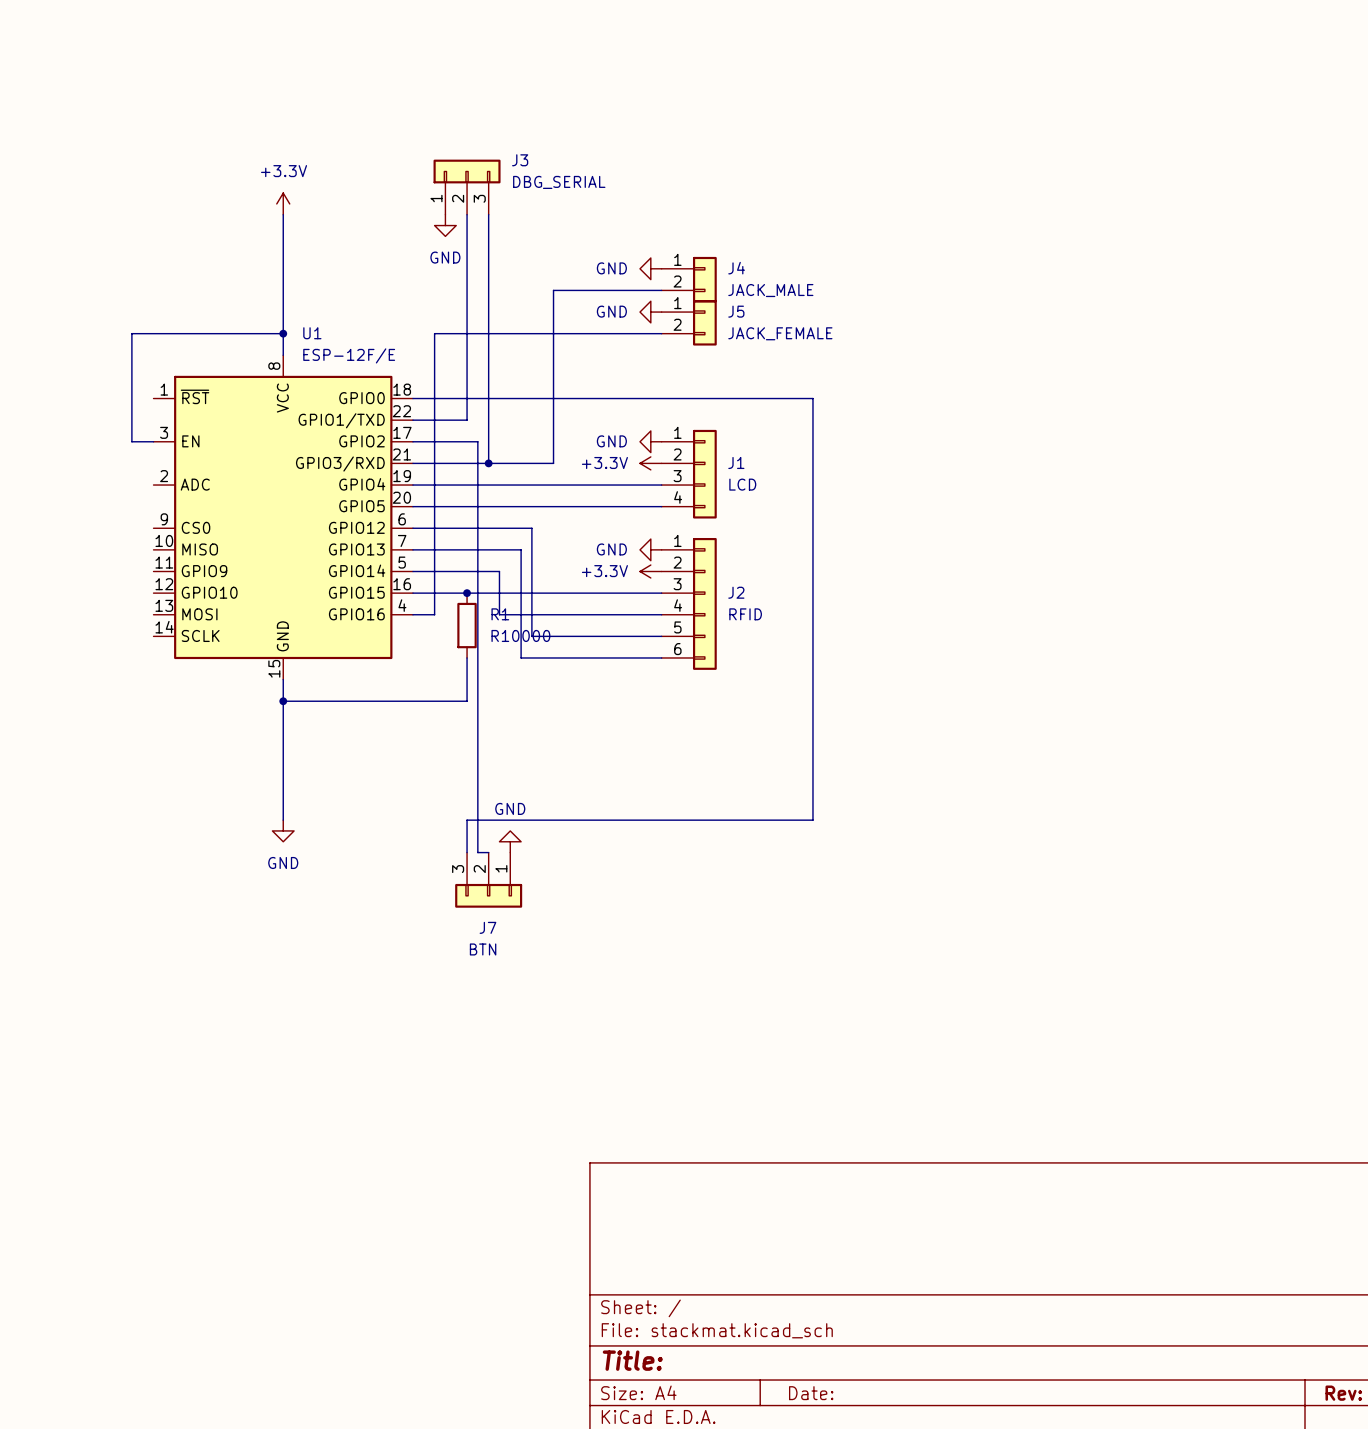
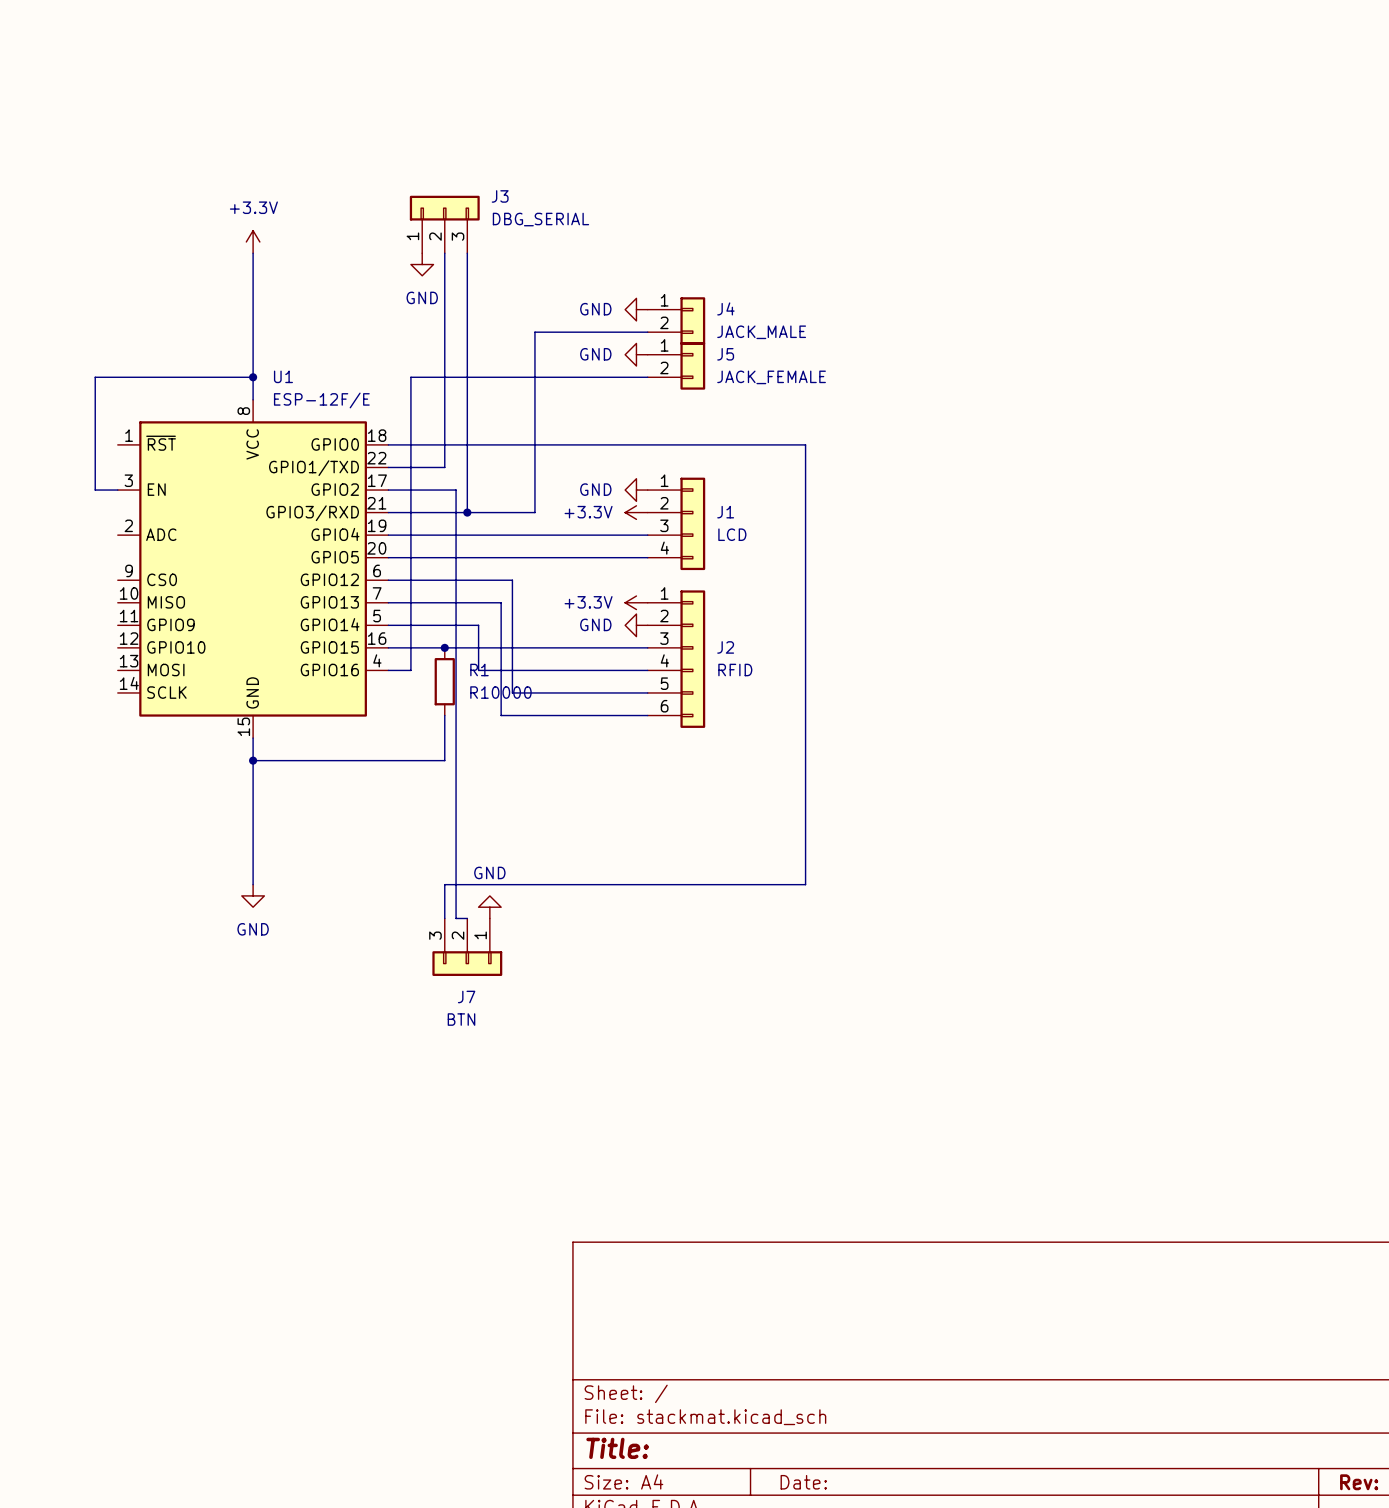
power symbol: GND (650, 549) -> +3.3V (636, 602)
power symbol: +3.3V (650, 571) -> GND (636, 625)

